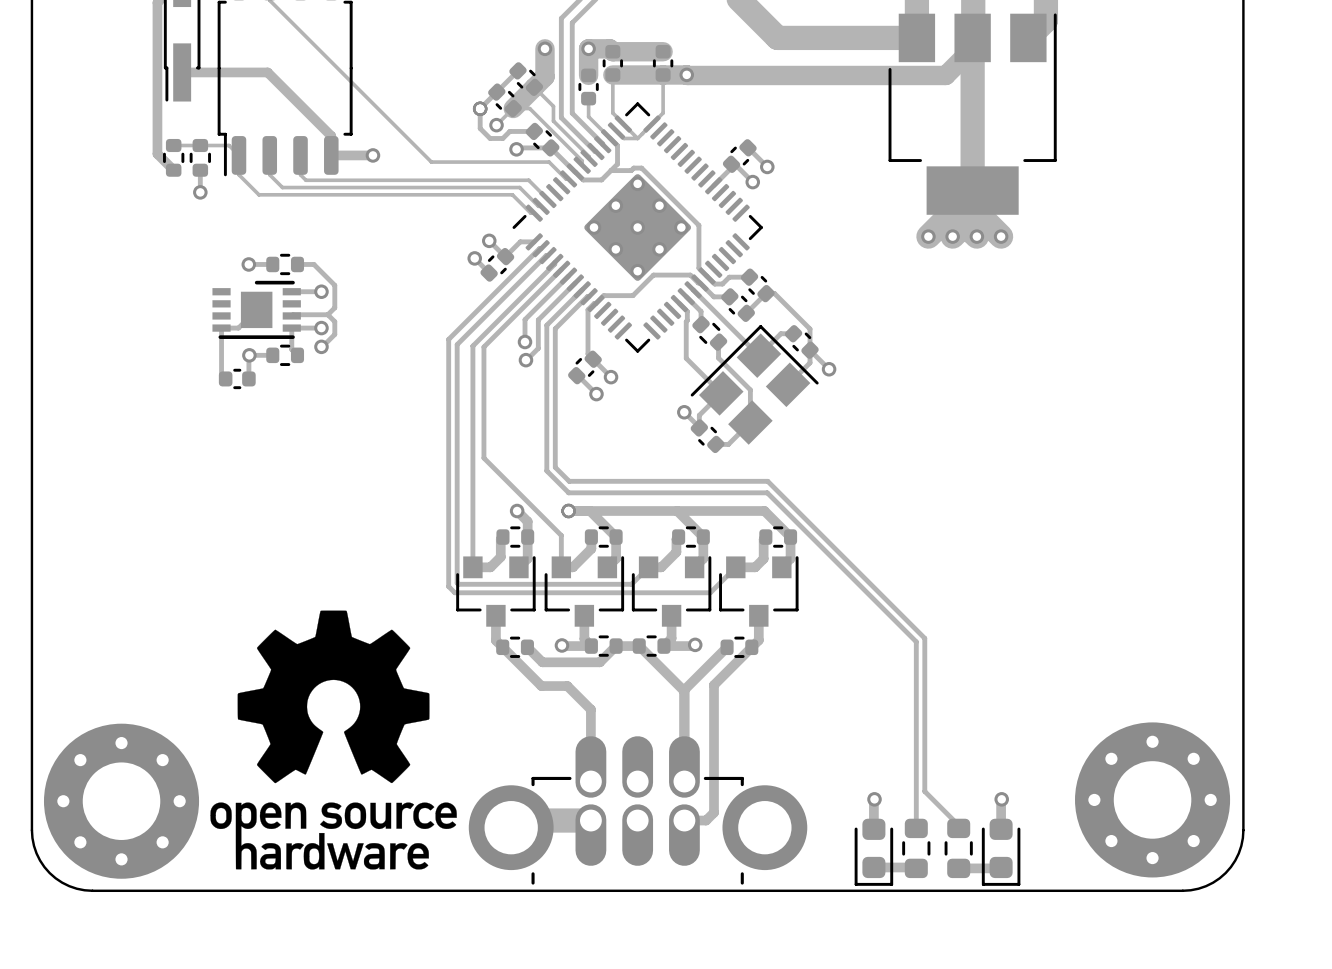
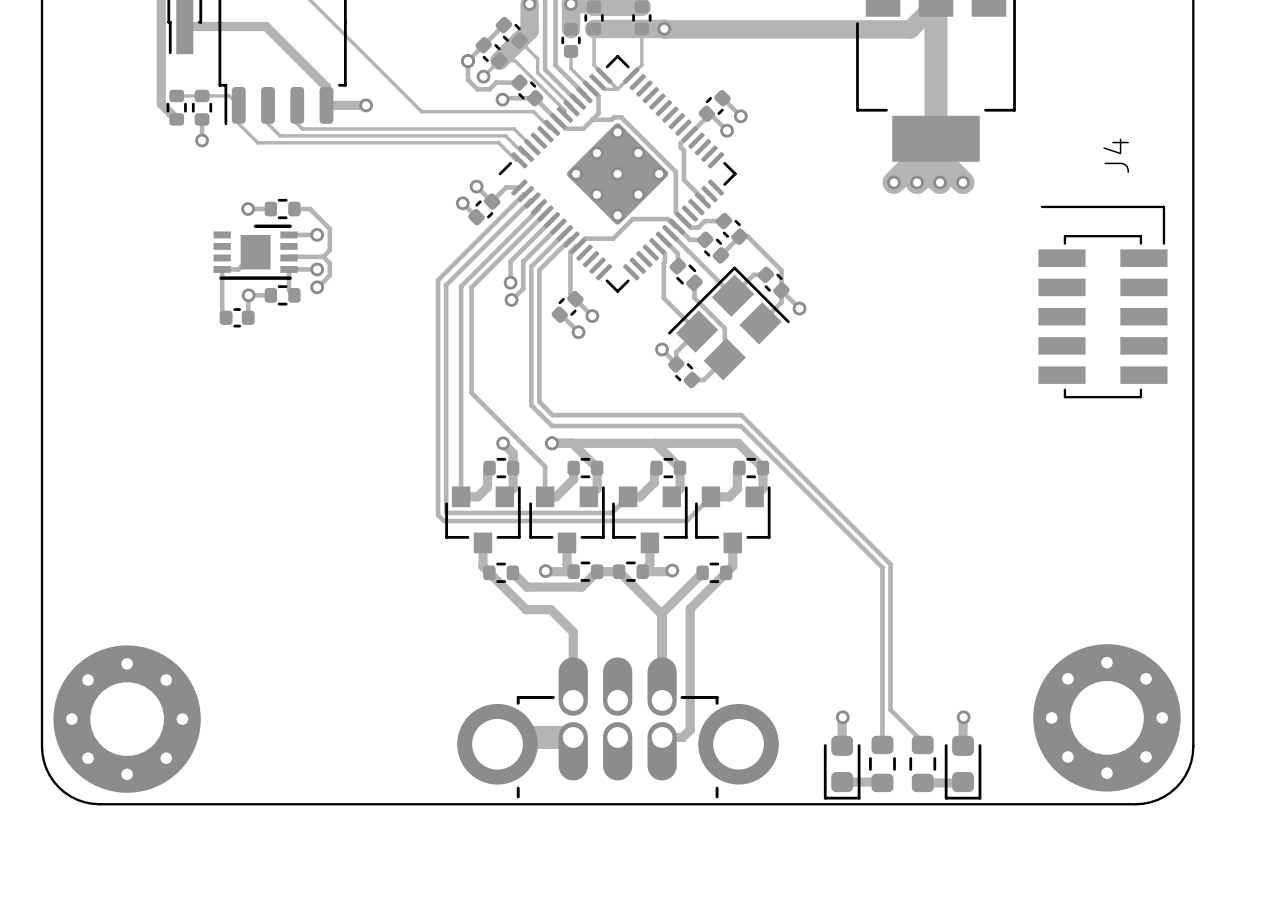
track: none -> (689, 134) (680, 143) (680, 147) (683, 150) (683, 179) (702, 200)
J4: none -> (1102, 302)
drawing: [210, 610, 457, 870] -> none

